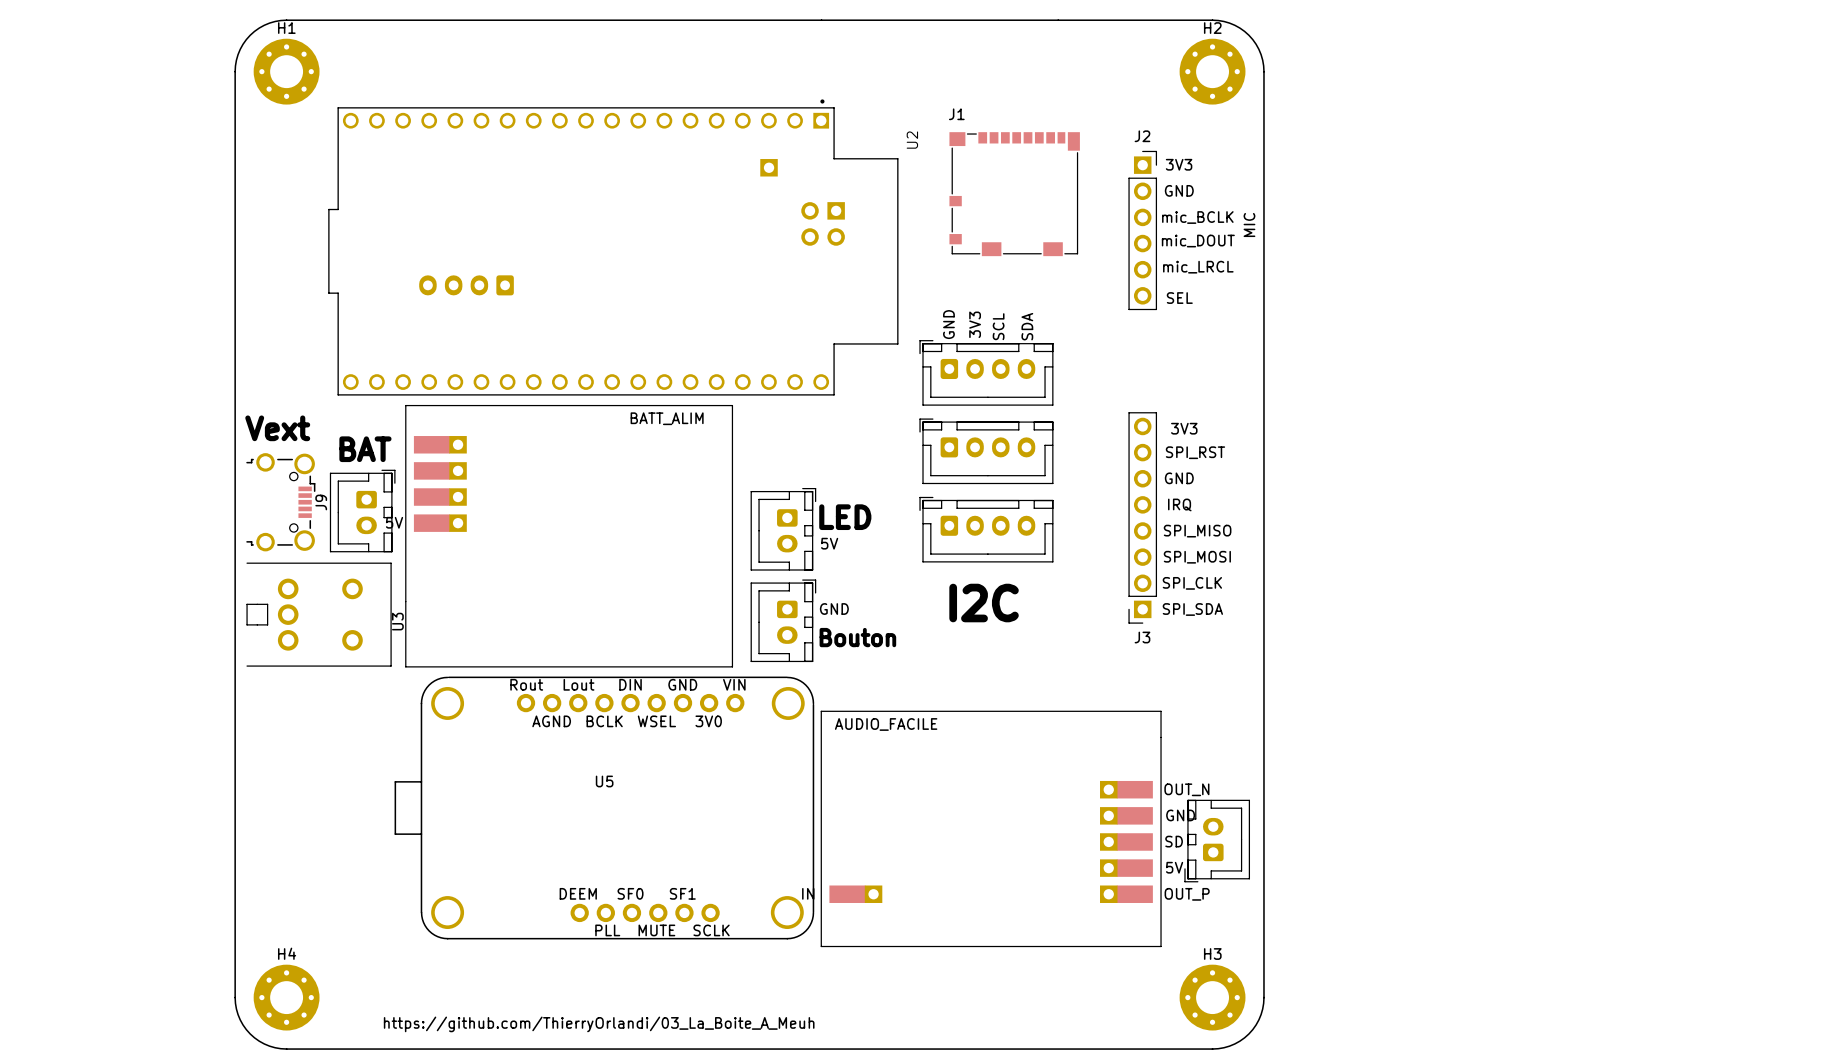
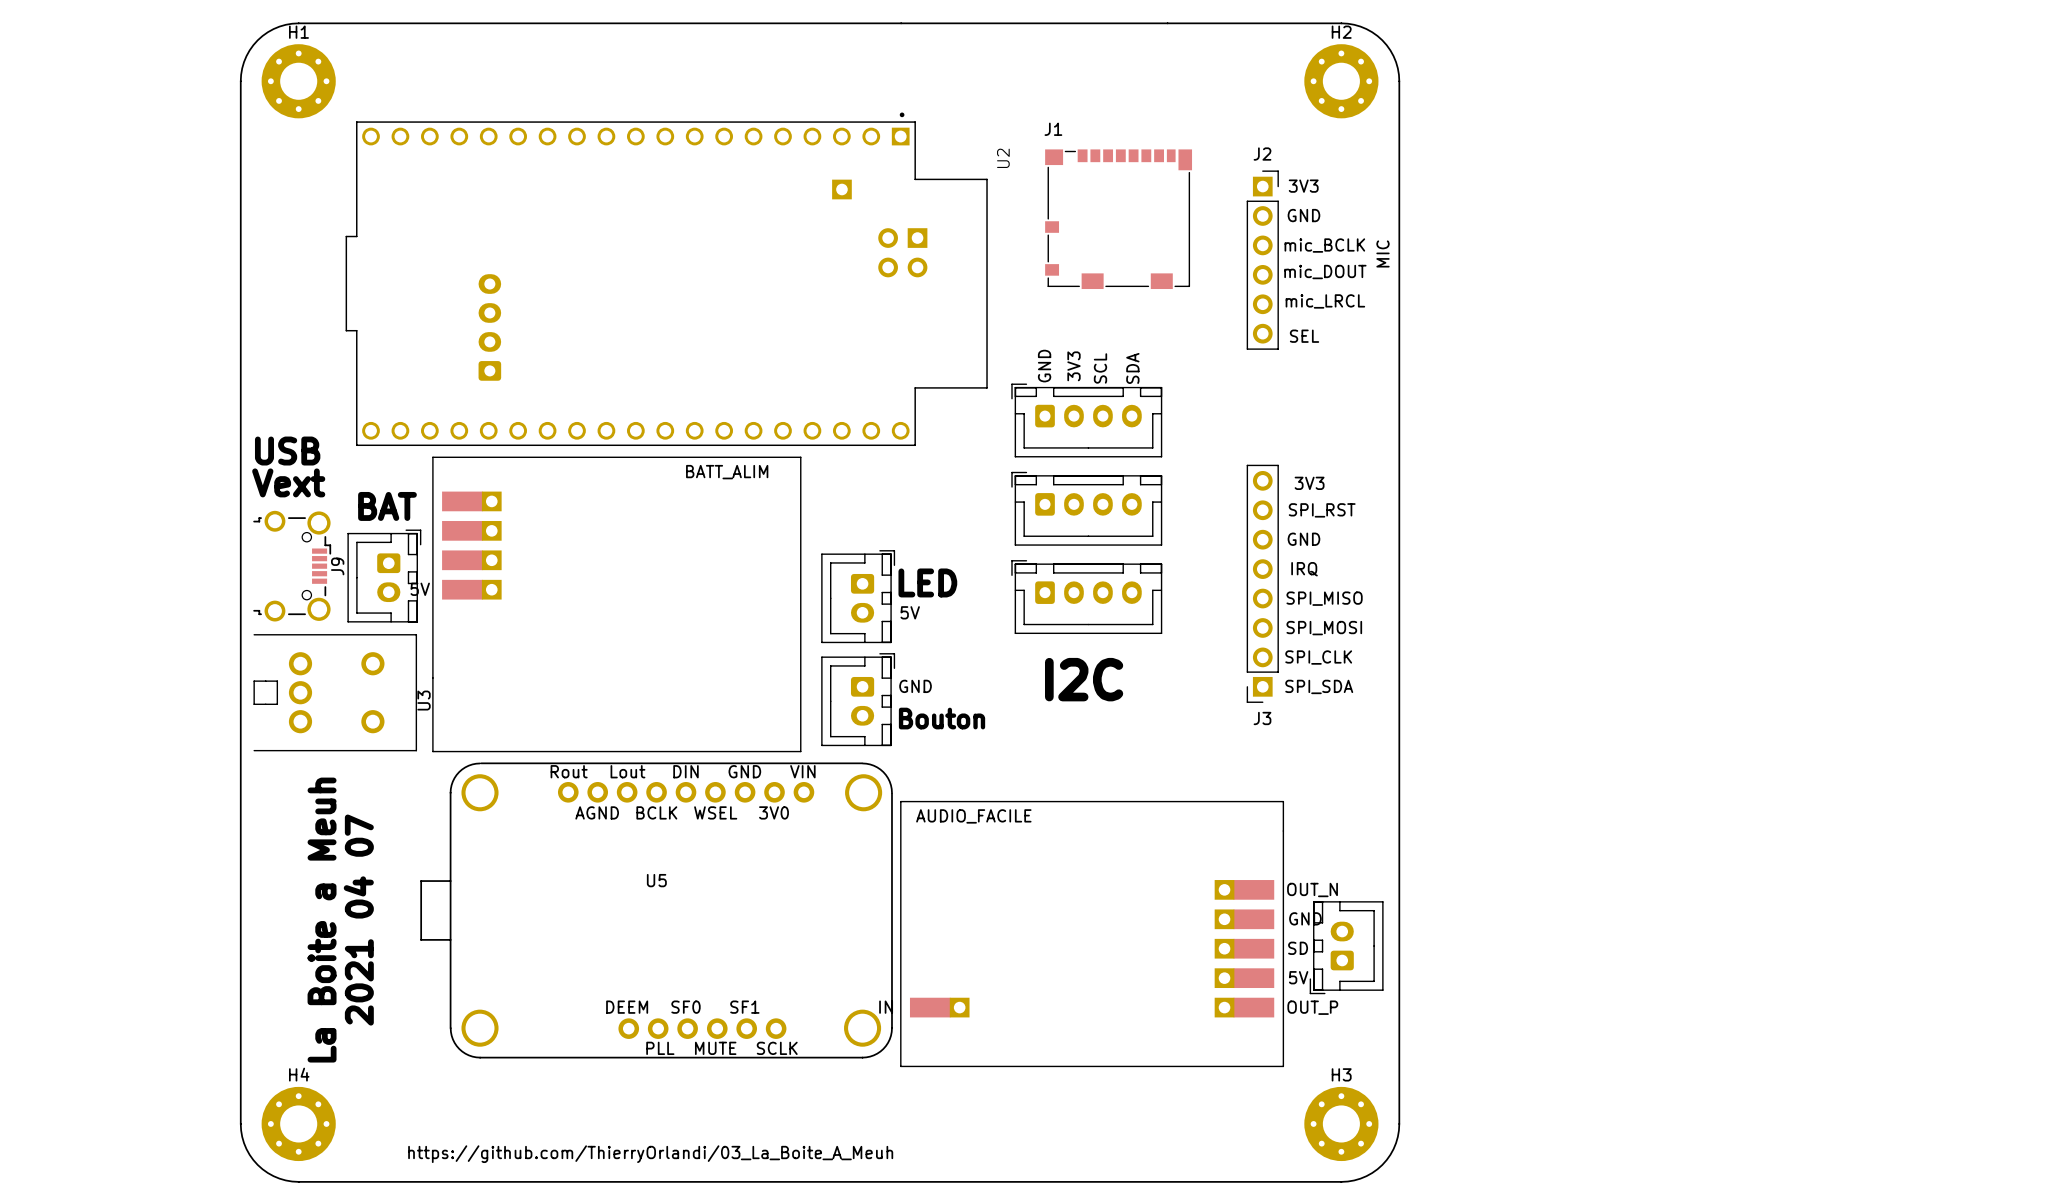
part rotation: 0° (466, 285) -> 90° clockwise (489, 327)
text: none -> USB (287, 451)
text: none -> La Boite a Meuh (322, 920)
text: none -> 2021 04 07 (358, 920)

